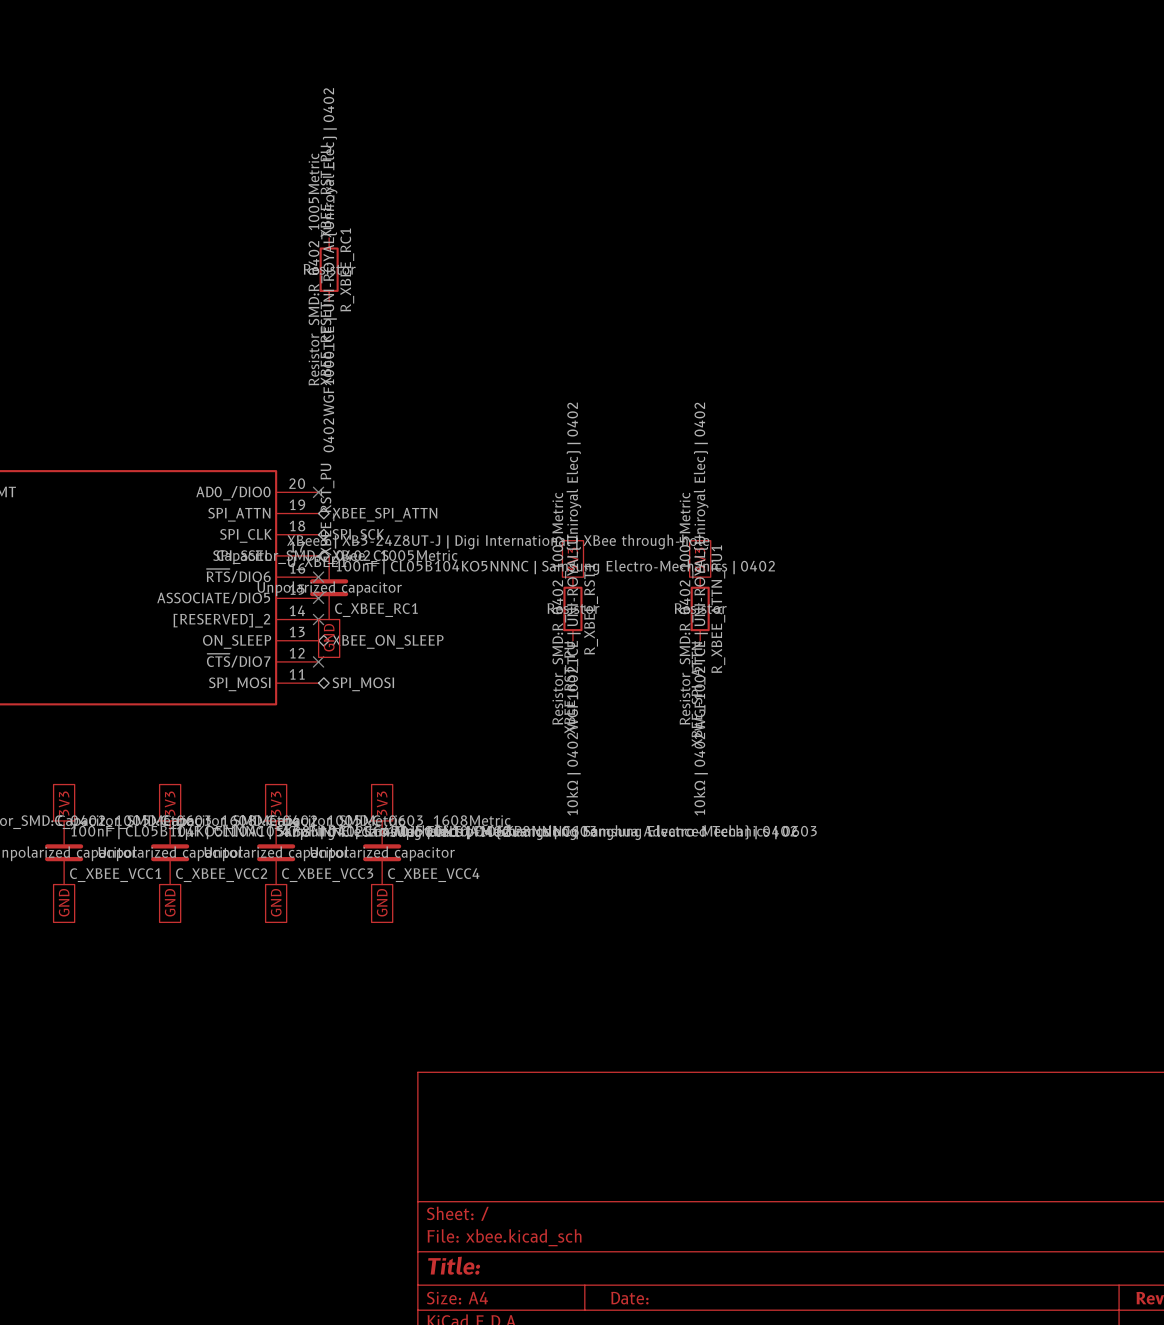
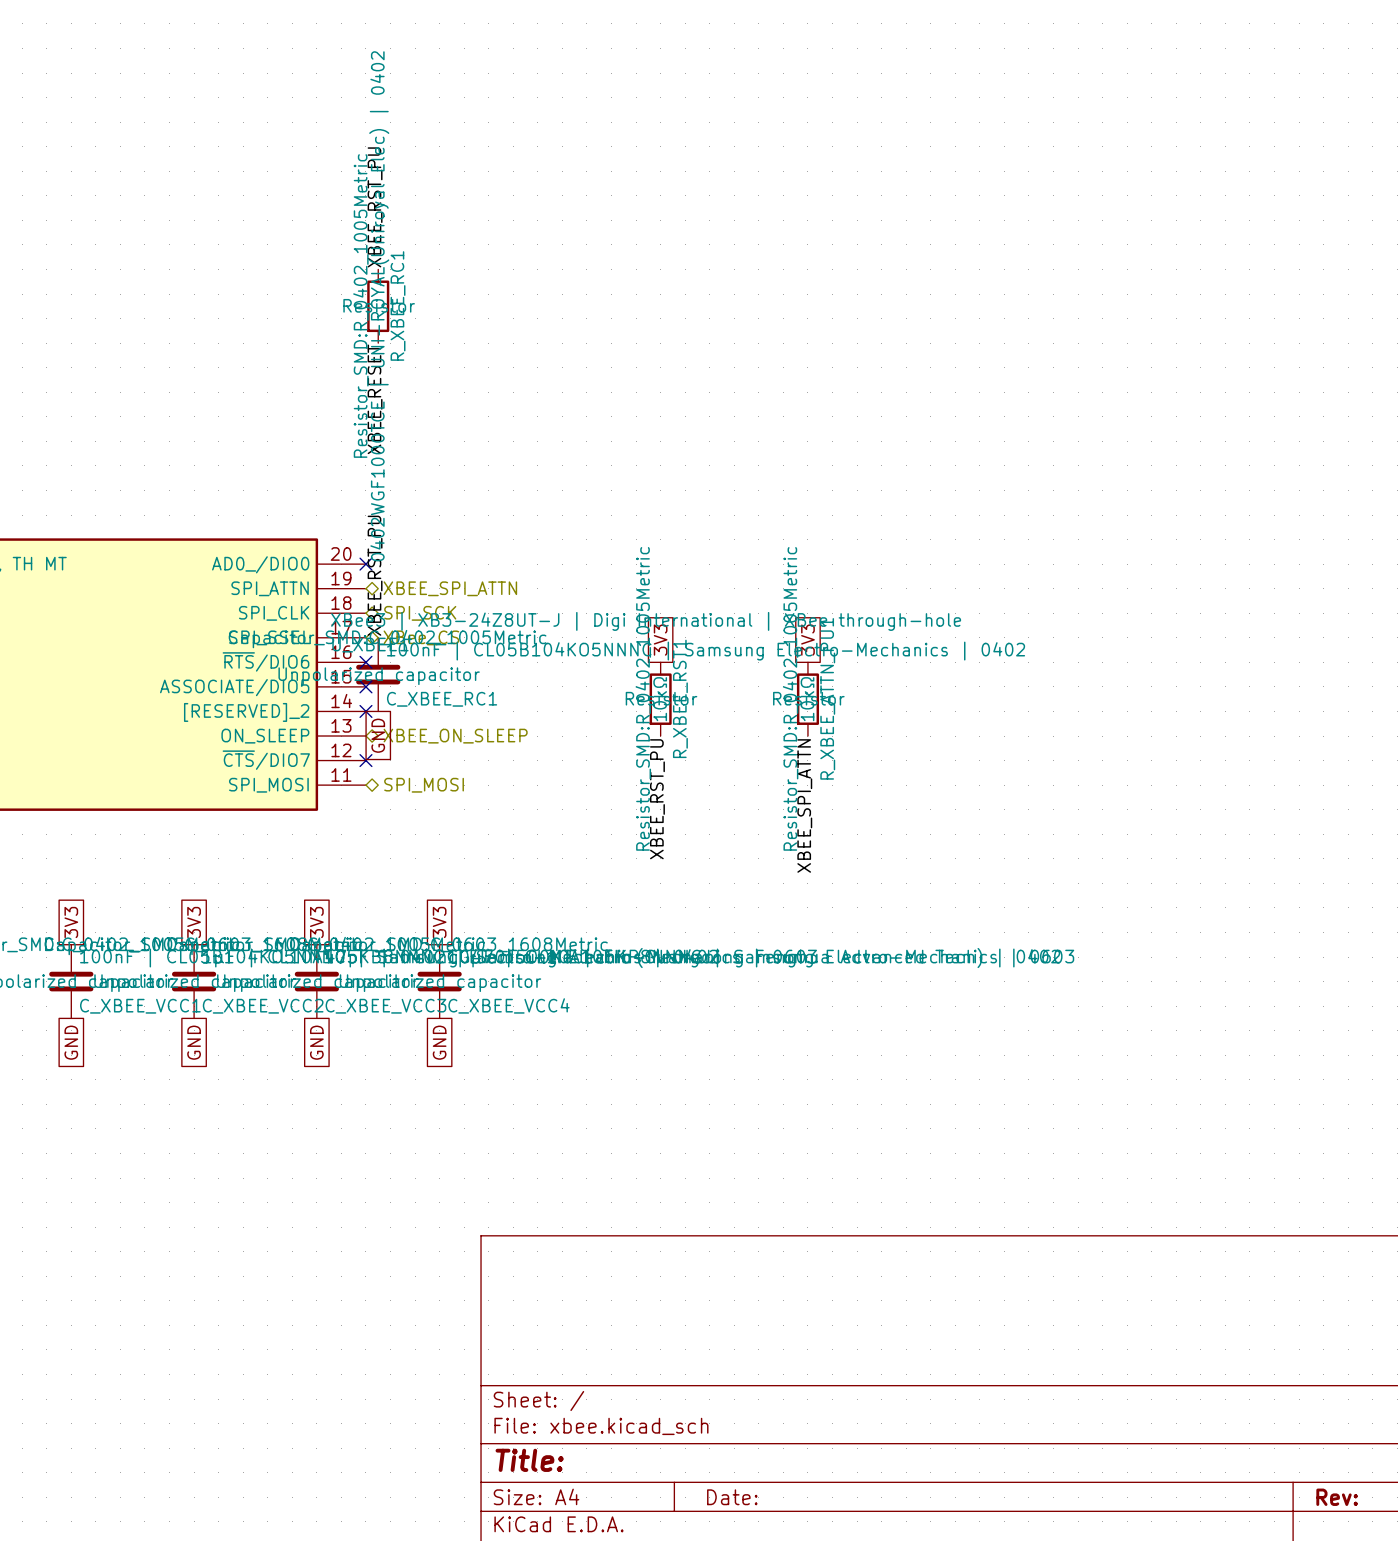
R_XBEE_RST1 value: 10kΩ | 0402WGF1002TCE | UNI-ROYAL(Uniroyal Elec) | 0402 (573, 609) -> 10kΩ (660, 699)
R_XBEE_ATTN_PU1 value: 10kΩ | 0402WGF1002TCE | UNI-ROYAL(Uniroyal Elec) | 0402 (701, 609) -> 10kΩ (807, 699)

